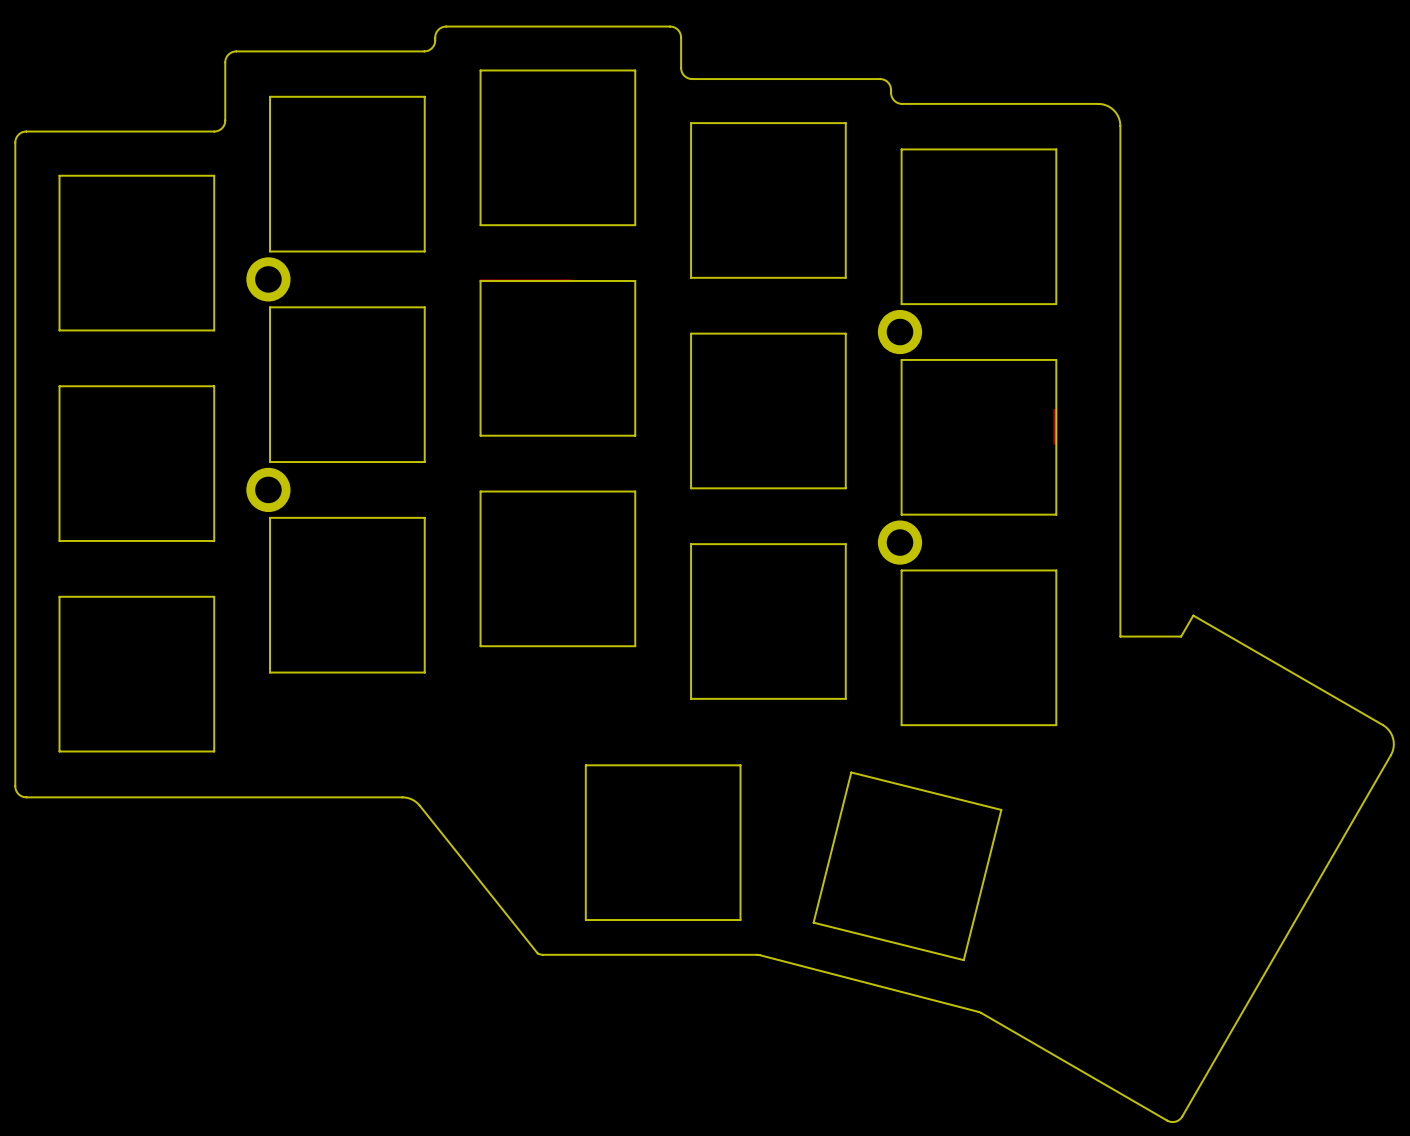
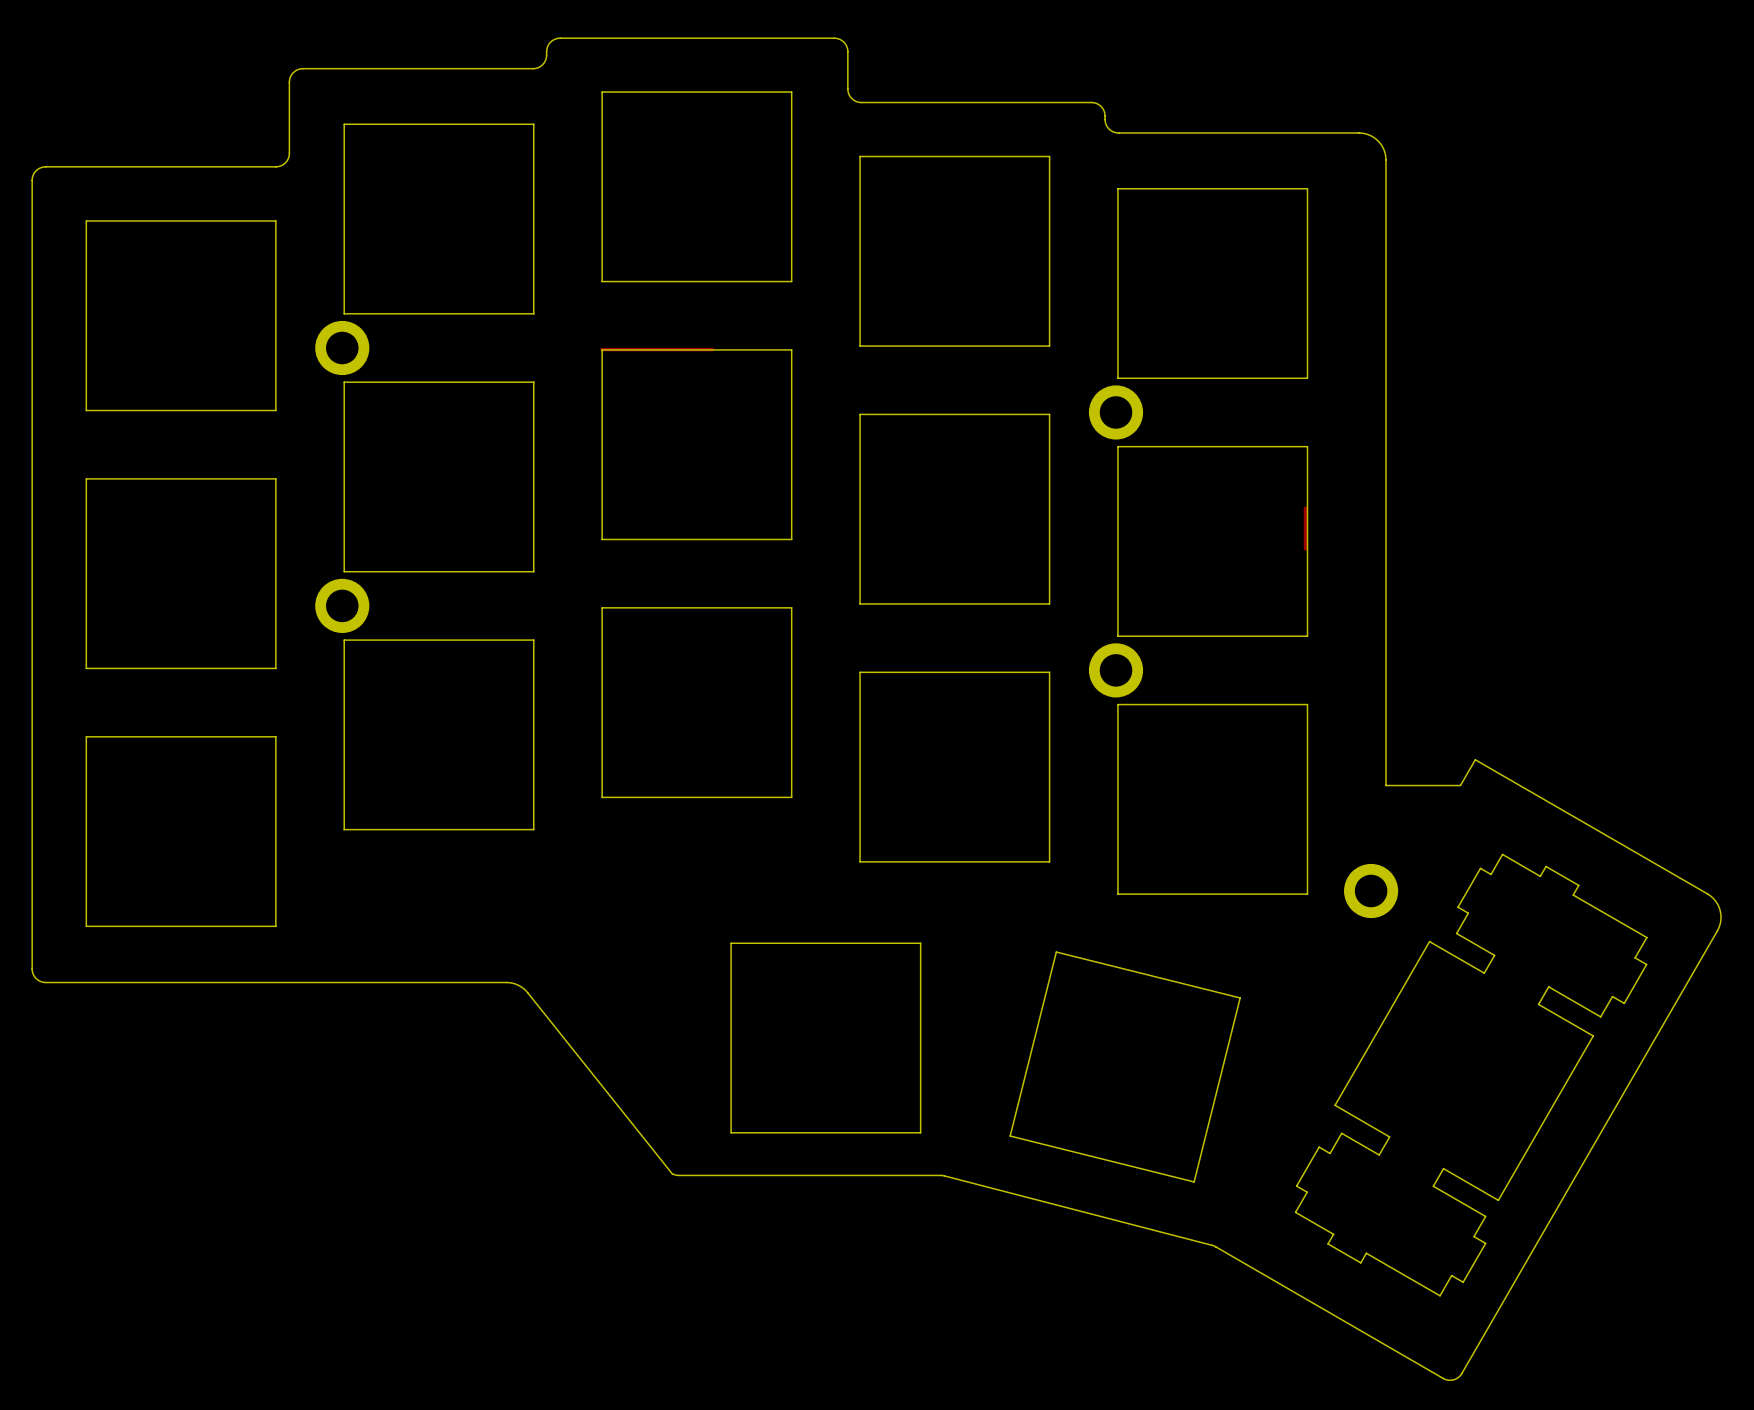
board edge: none -> (1502, 854) (1491, 874) (1480, 868) (1458, 907) (1468, 913) (1456, 933) (1494, 955) (1484, 973) (1429, 941) (1335, 1105) (1389, 1136) (1379, 1154) (1341, 1133) (1330, 1153) (1319, 1147) (1296, 1186) (1307, 1192) (1295, 1212) (1333, 1234) (1328, 1243) (1360, 1262) (1366, 1253) (1440, 1295) (1451, 1275) (1463, 1282) (1485, 1243) (1473, 1236) (1485, 1216) (1433, 1186) (1443, 1168) (1498, 1200) (1593, 1035) (1538, 1004) (1548, 986) (1600, 1016) (1612, 996) (1624, 1003) (1646, 964) (1635, 957) (1646, 937) (1573, 895) (1578, 885) (1546, 866) (1540, 876) (1502, 854)
part: none -> (1371, 890)

